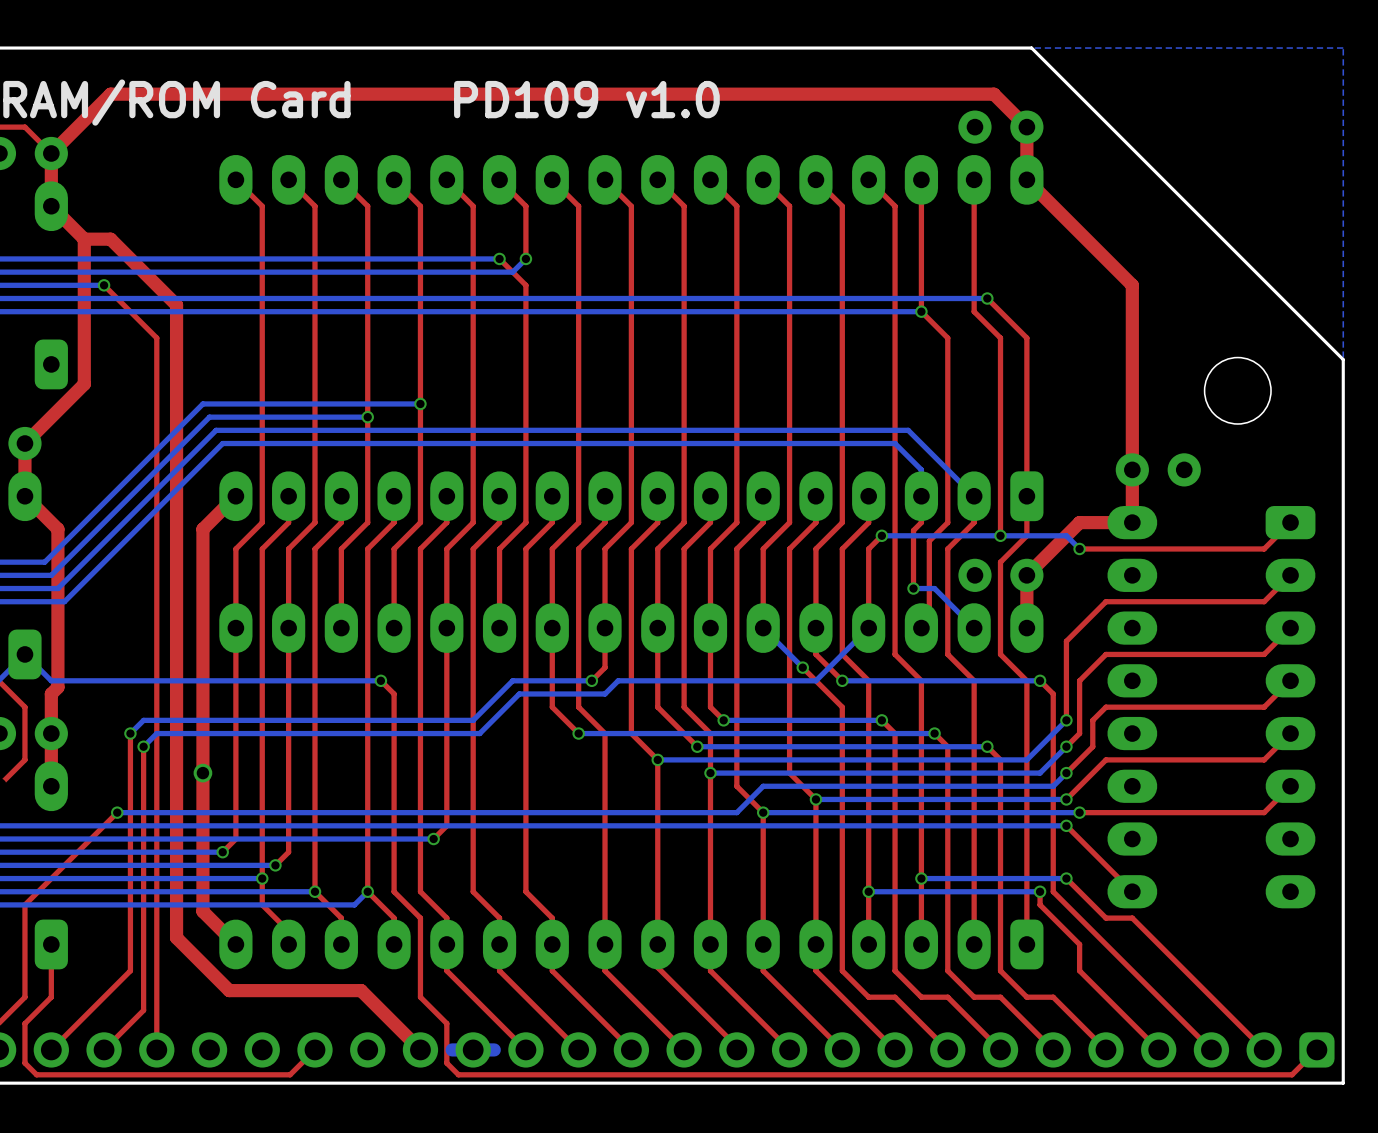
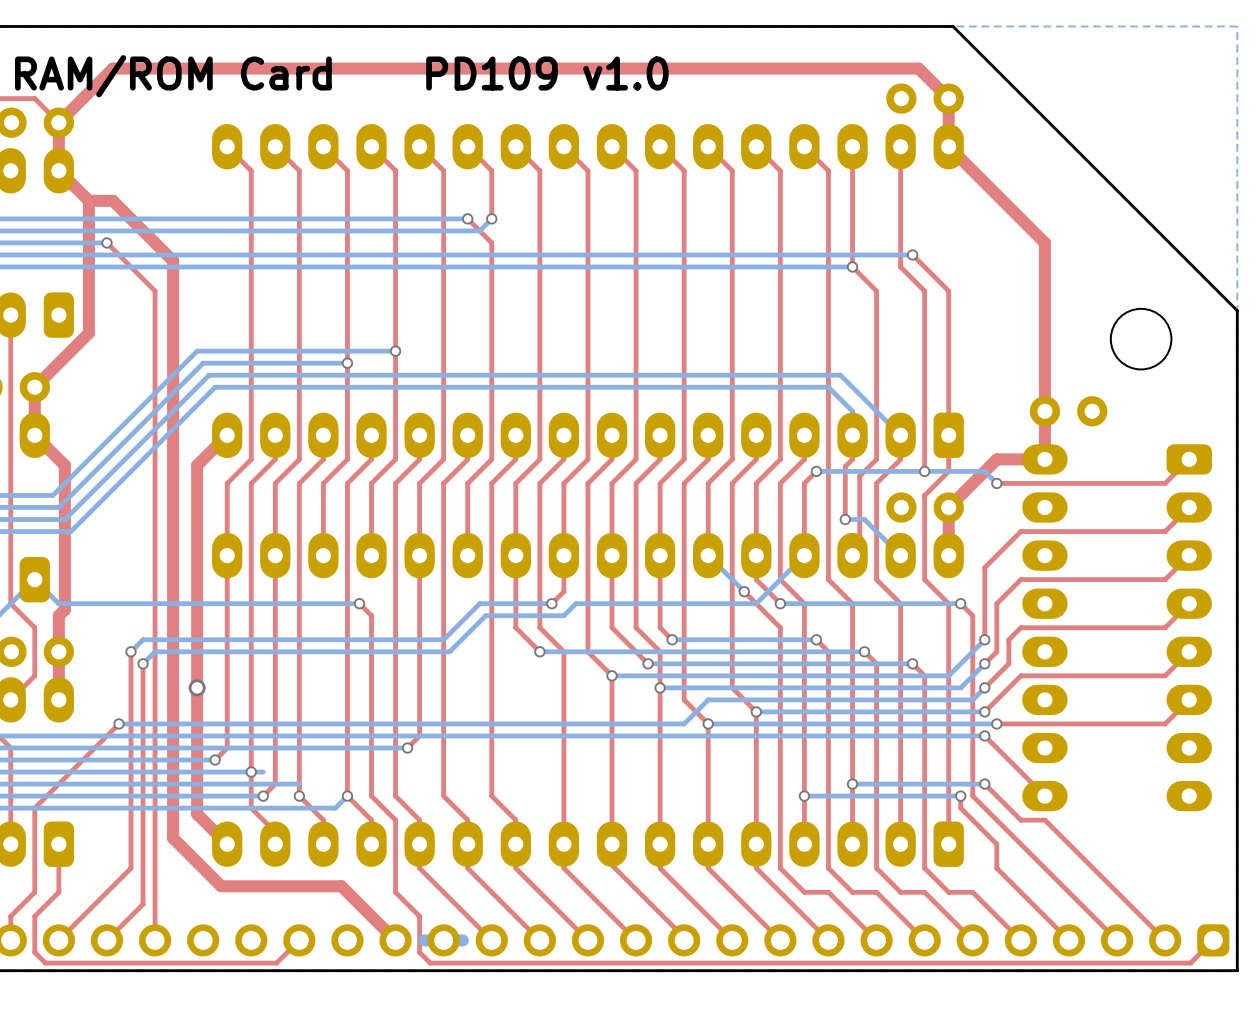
top track: (288, 852) (275, 865) -> (275, 760) (275, 784) (263, 796)
via: none -> (251, 772)
via: (275, 865) -> none
via: (262, 878) -> none
bottom track: none -> (299, 784) (251, 784)
via: none -> (263, 796)
bottom track: (314, 891) (275, 891) -> none

